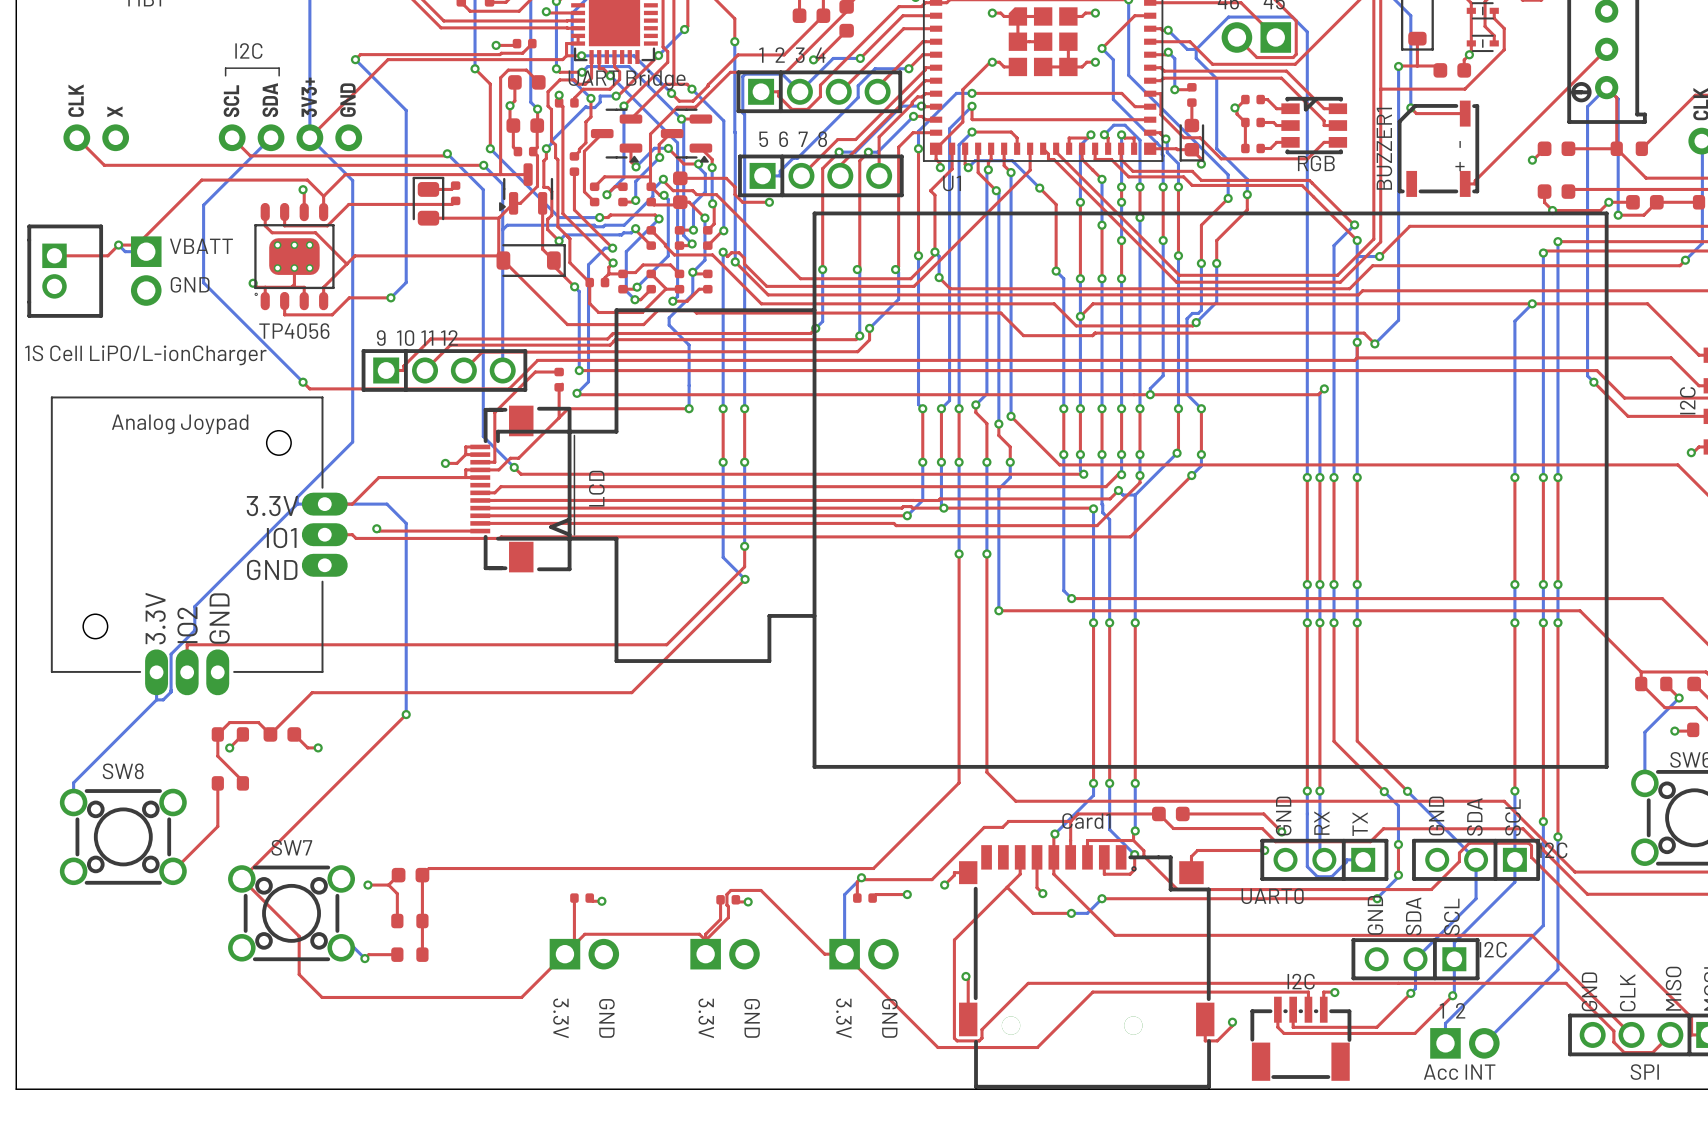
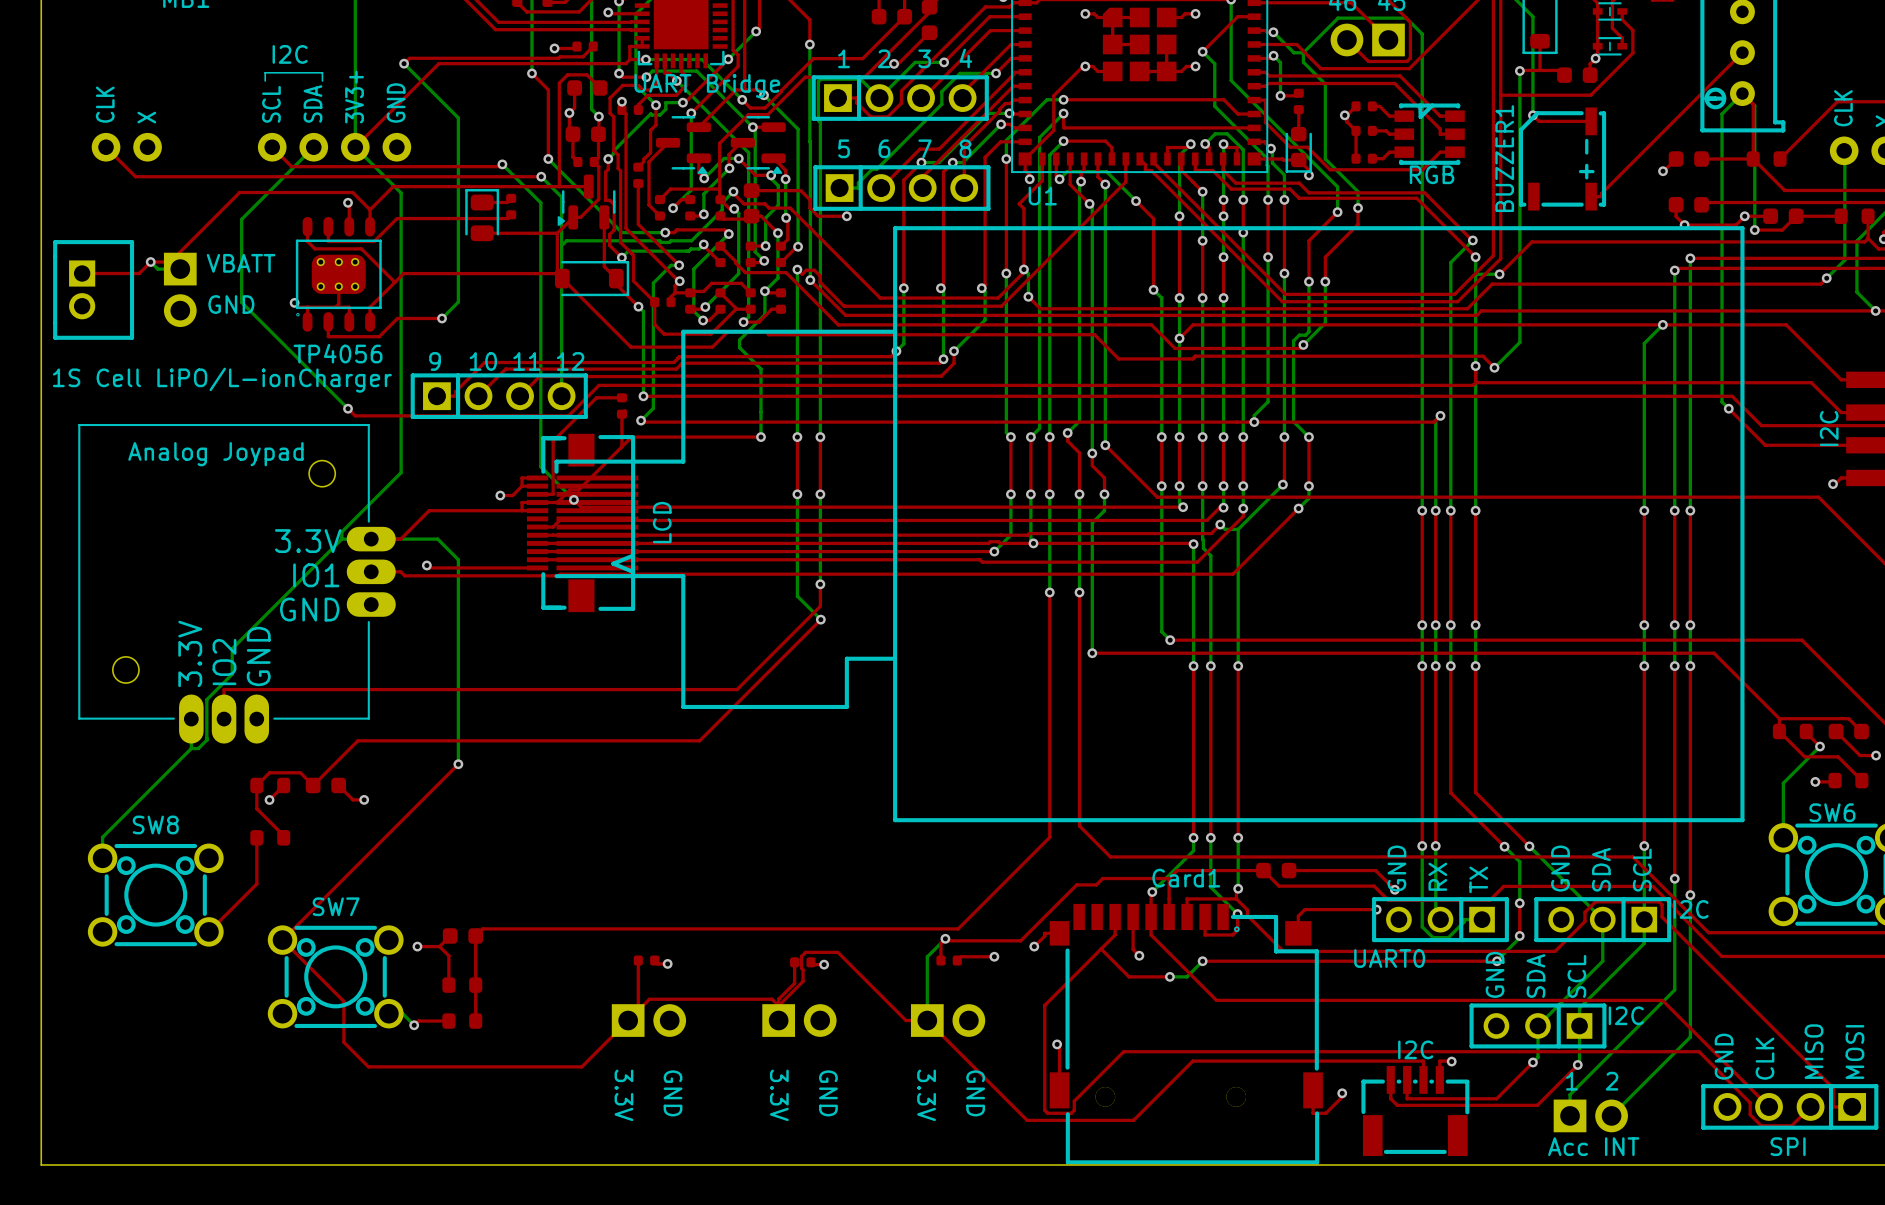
LCD footprint: [496, 211, 1609, 769] -> [554, 226, 1745, 823]

